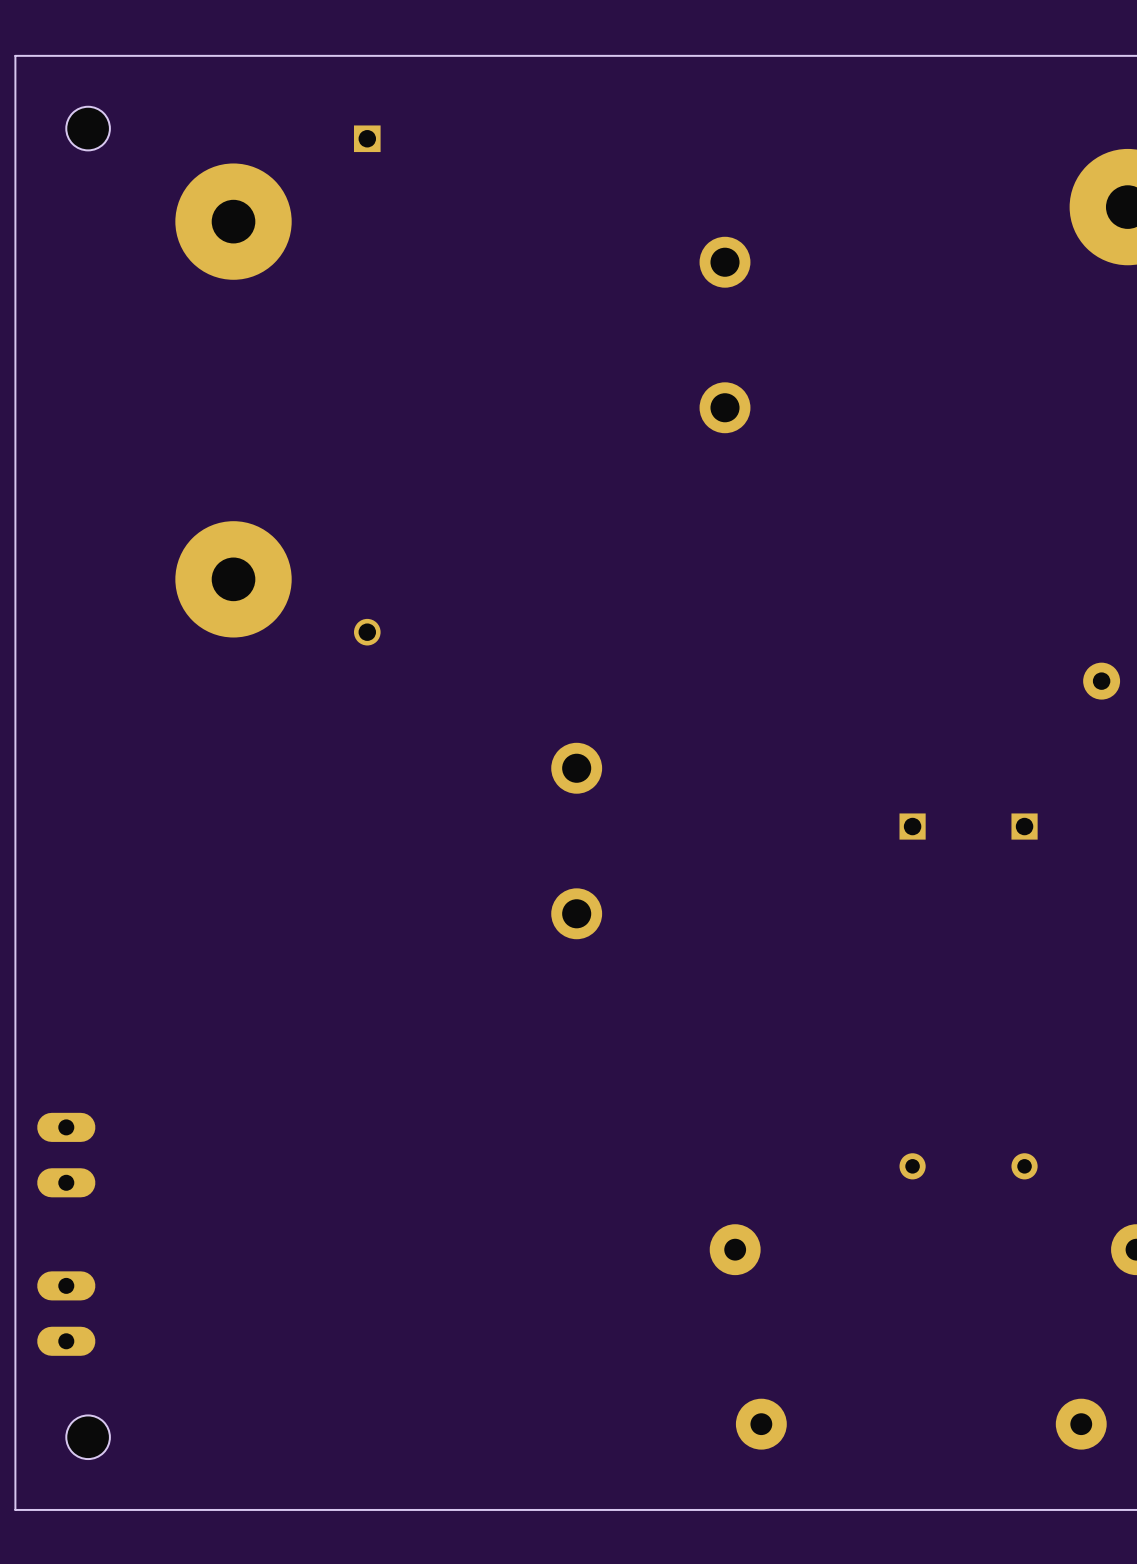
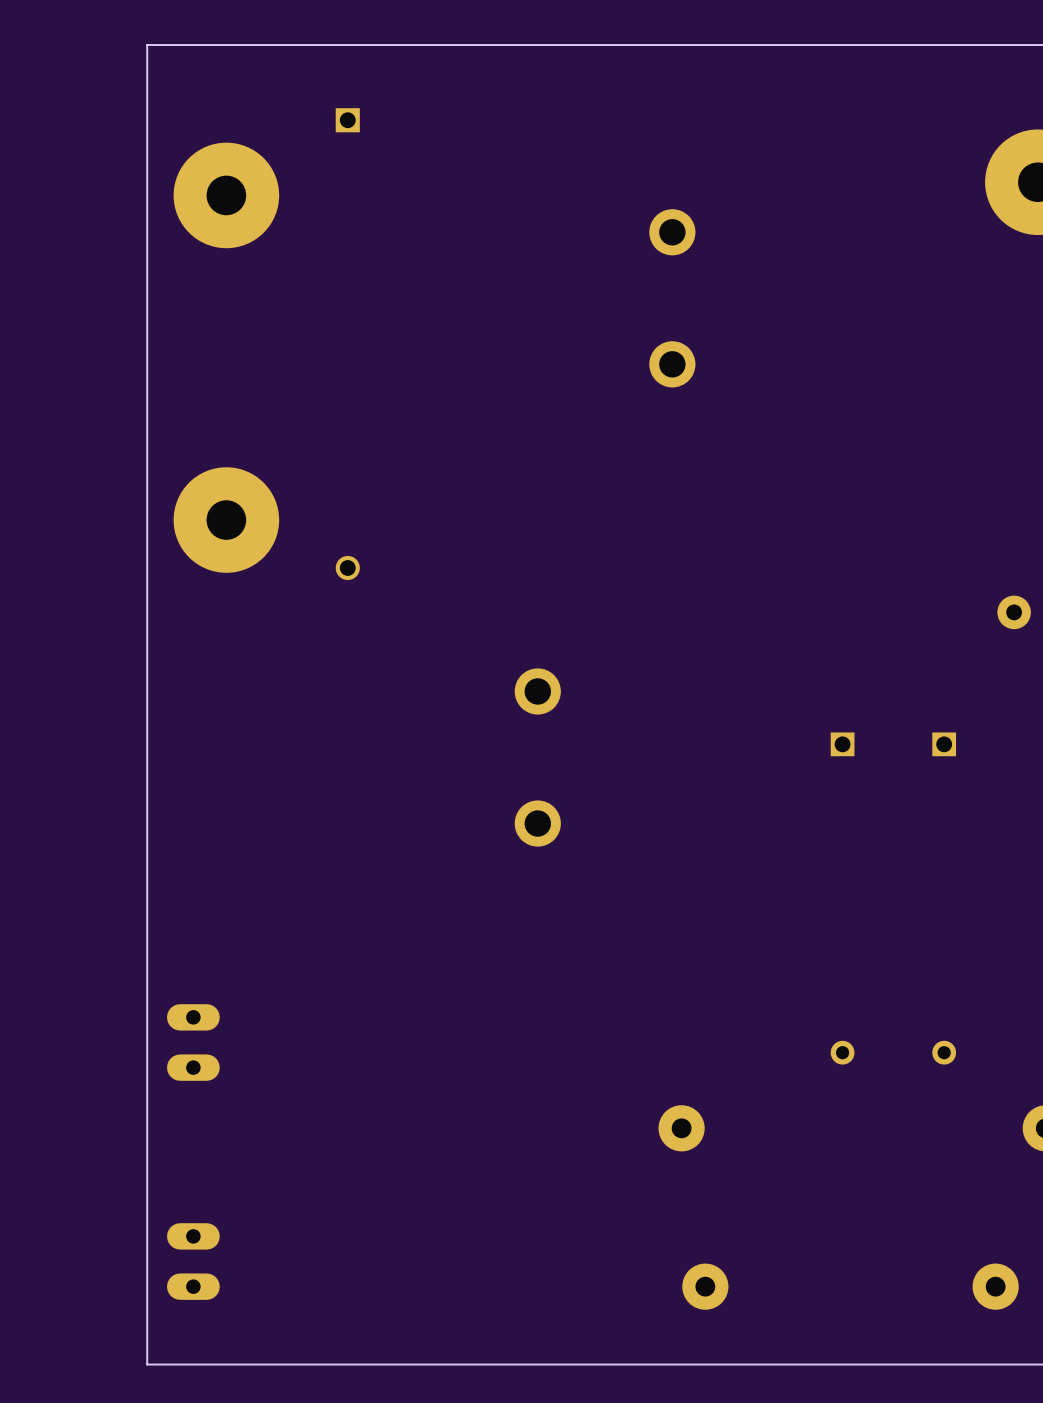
board edge: (146, 55) (15, 55) (15, 1509) (146, 1509) -> (147, 45) (147, 1364)
hole: (88, 128) -> none
part: (66, 1155) -> none
part: none -> (193, 1042)
part: (66, 1313) -> none
part: none -> (193, 1261)
hole: (88, 1437) -> none

